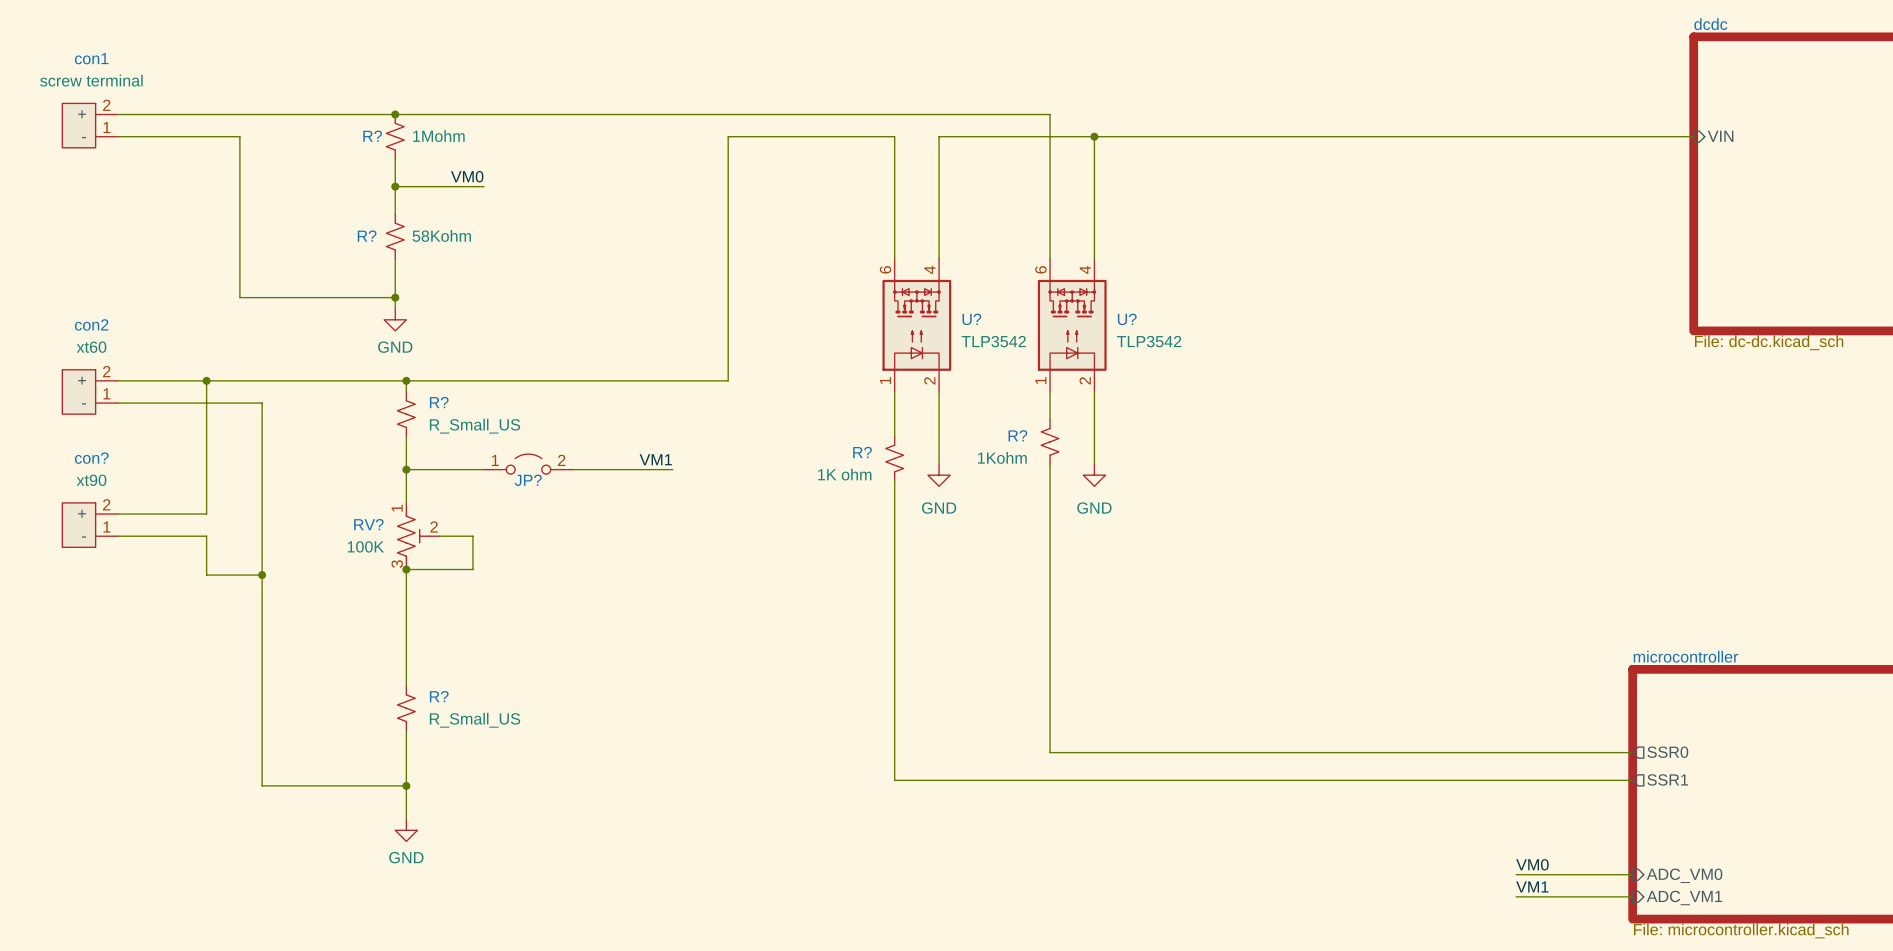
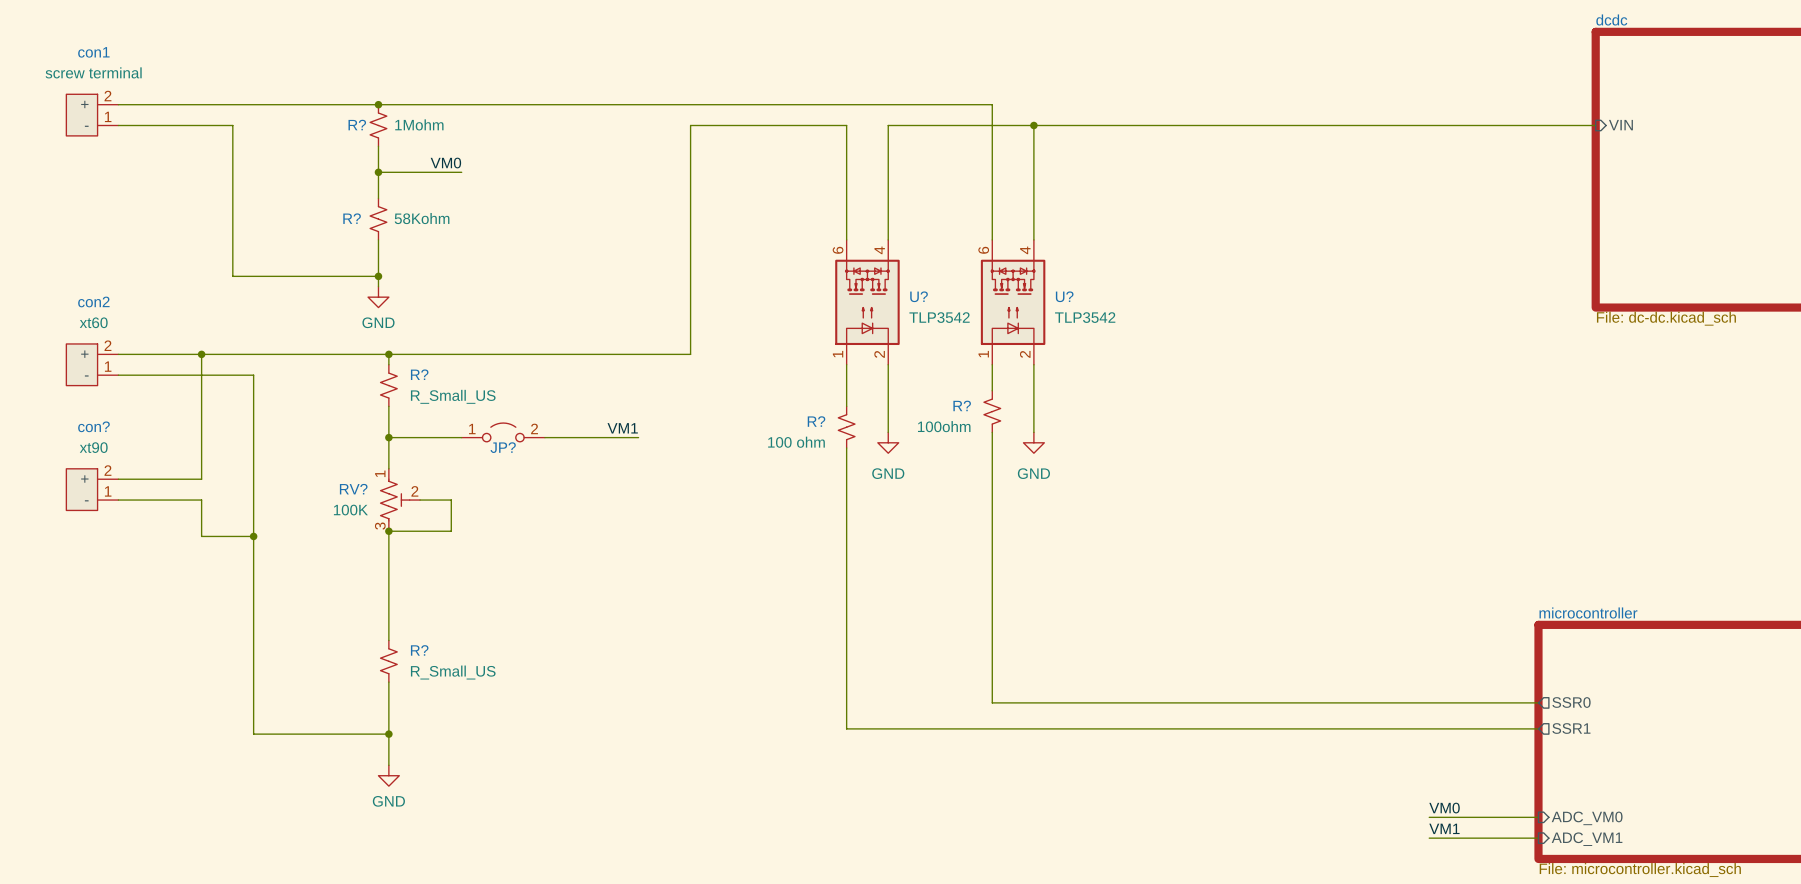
R? value: 1Kohm (1002, 457) -> 100ohm (944, 426)
R? value: 1K ohm (844, 474) -> 100 ohm (796, 442)

